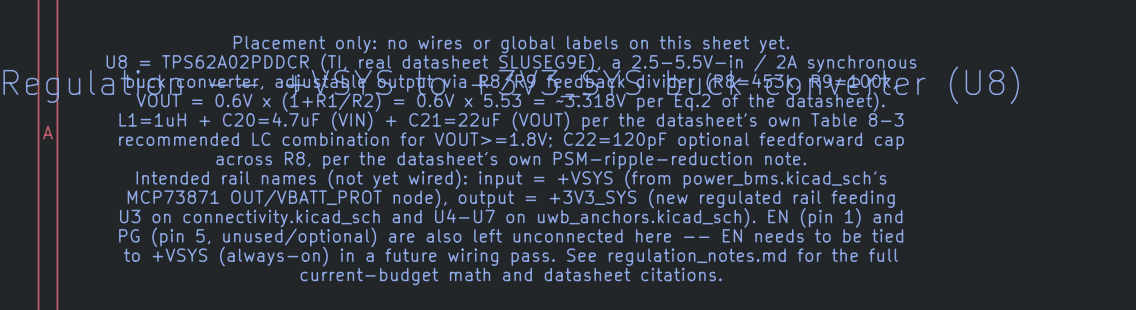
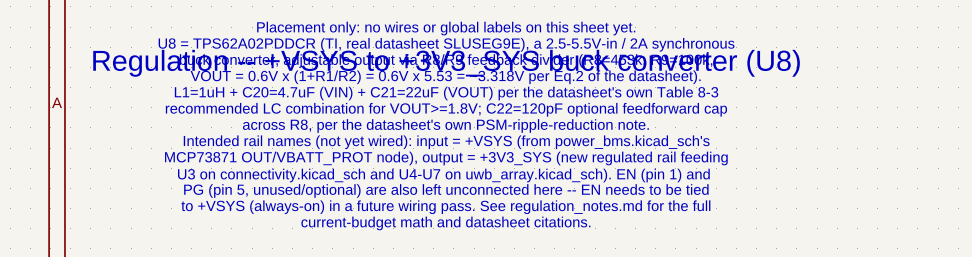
text: U3 on connectivity.kicad_sch and U4-U7 on uwb_anchors.kicad_sch). EN (pin 1) and (511, 217) -> U3 on connectivity.kicad_sch and U4-U7 on uwb_array.kicad_sch). EN (pin 1) and (443, 175)

